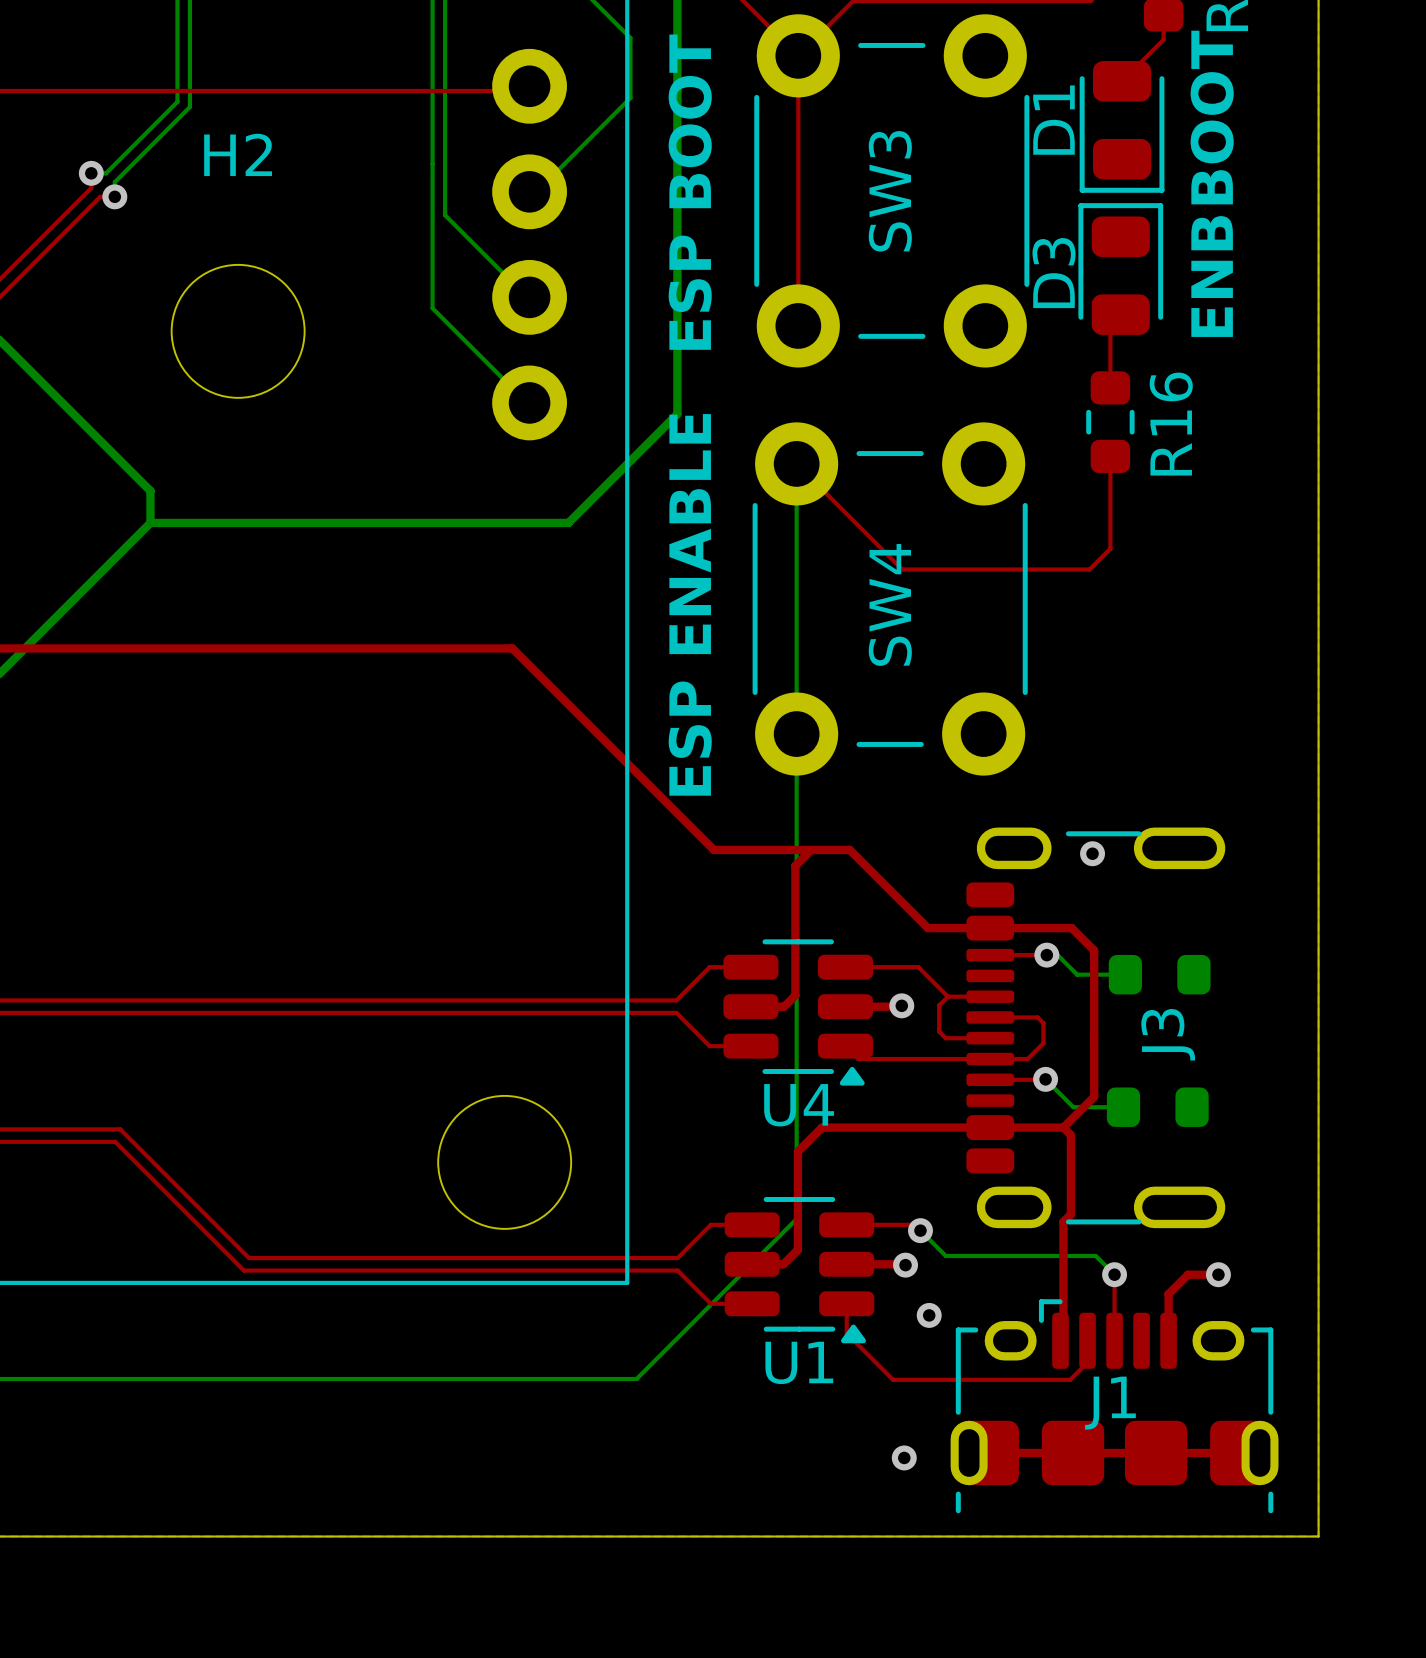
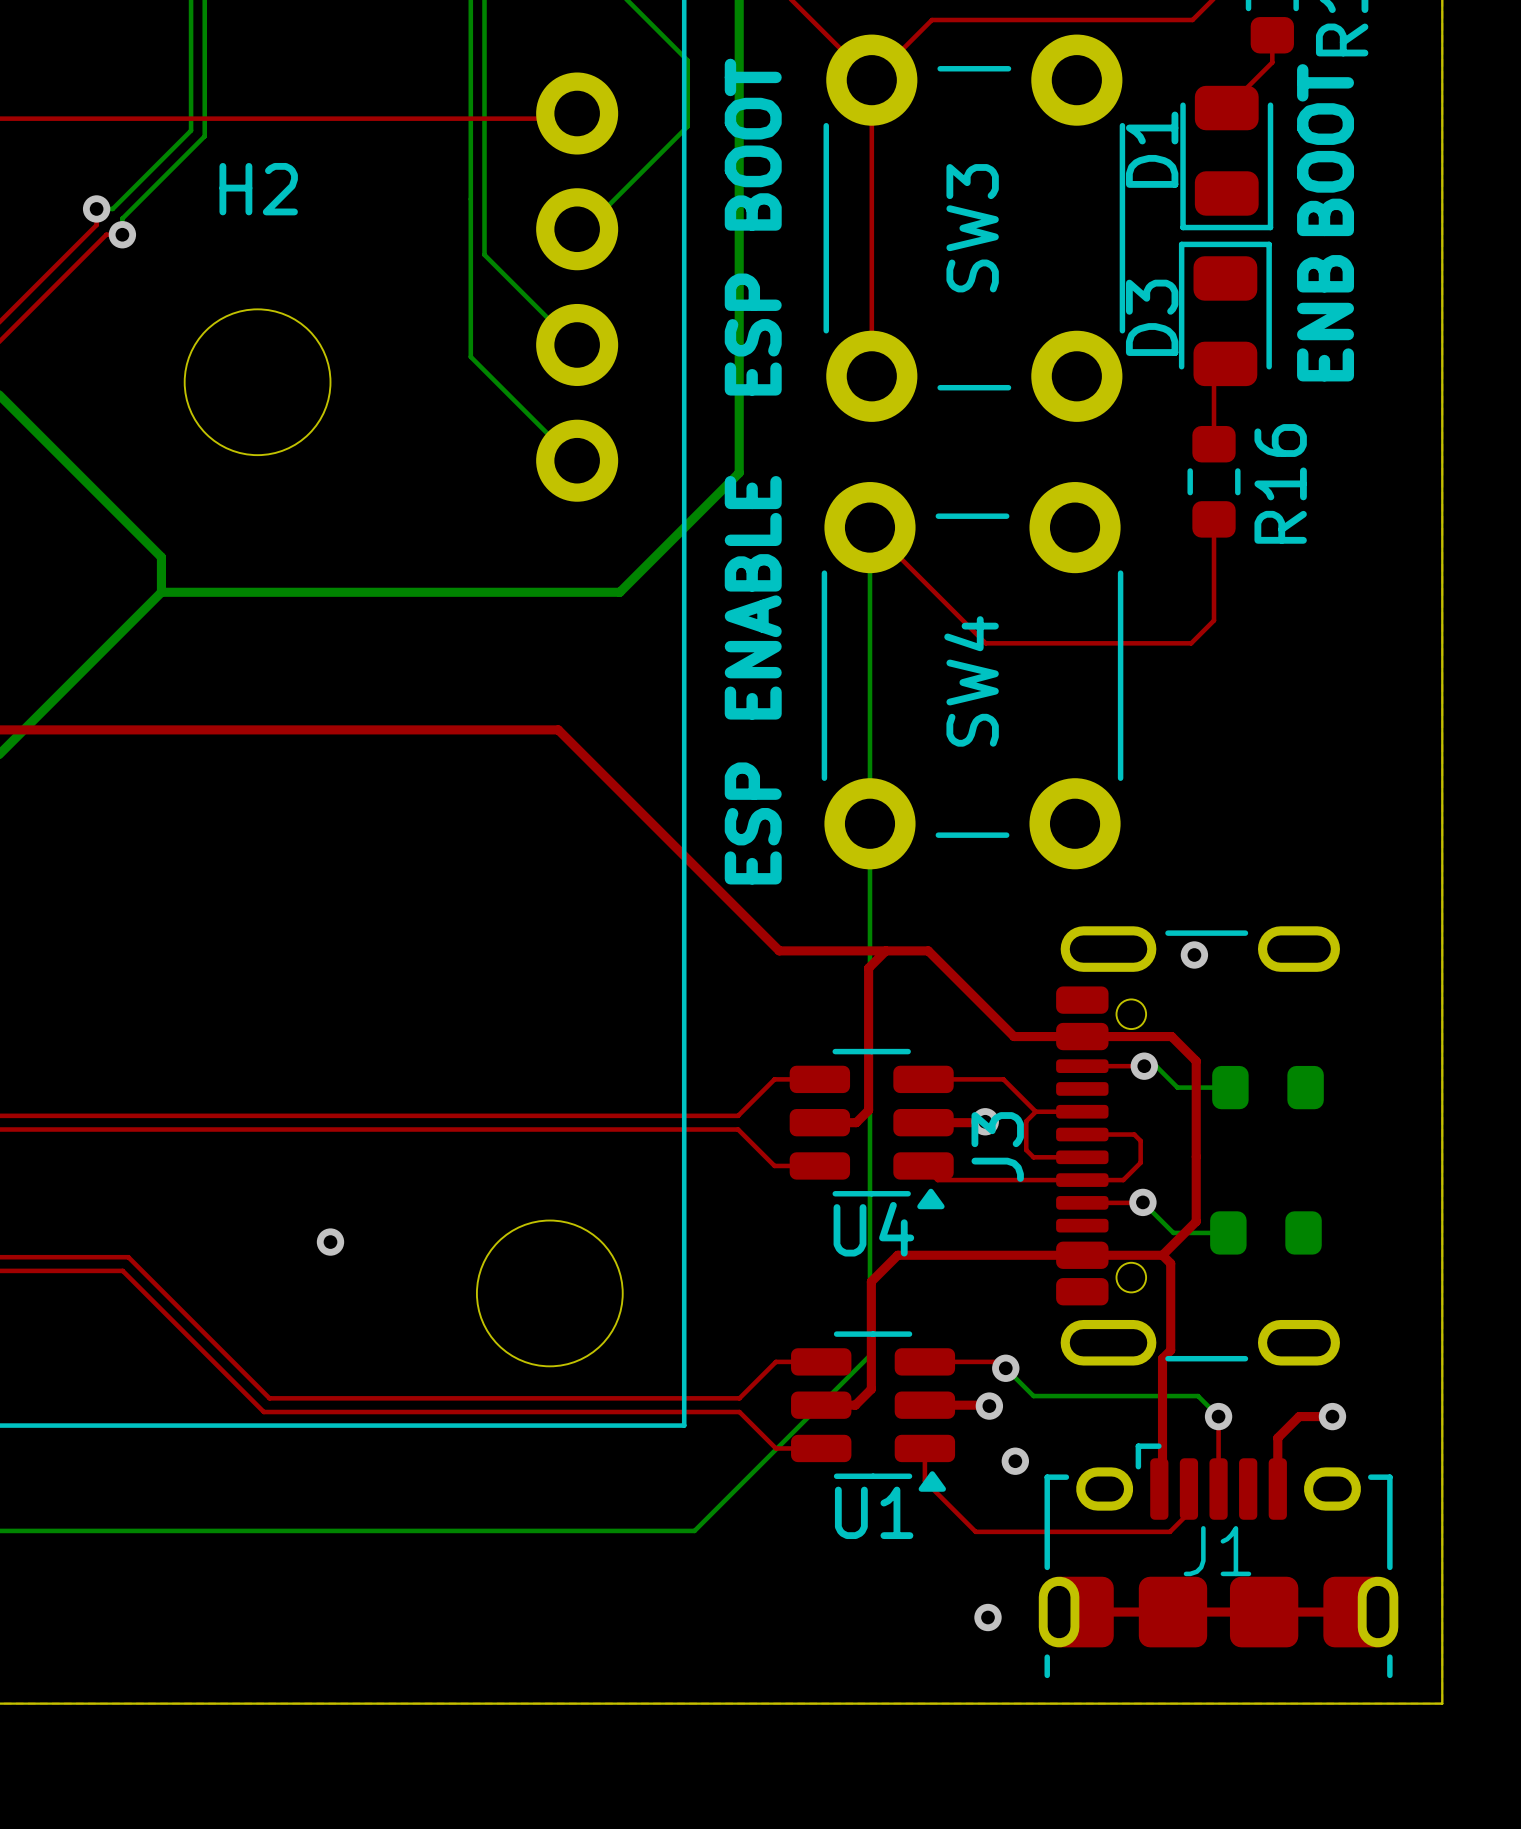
J3 footprint: [966, 827, 1226, 1229] -> [1056, 926, 1340, 1366]
J3 name position: J3 (1168, 1034) -> J3 (997, 1147)
via: none -> (330, 1242)

